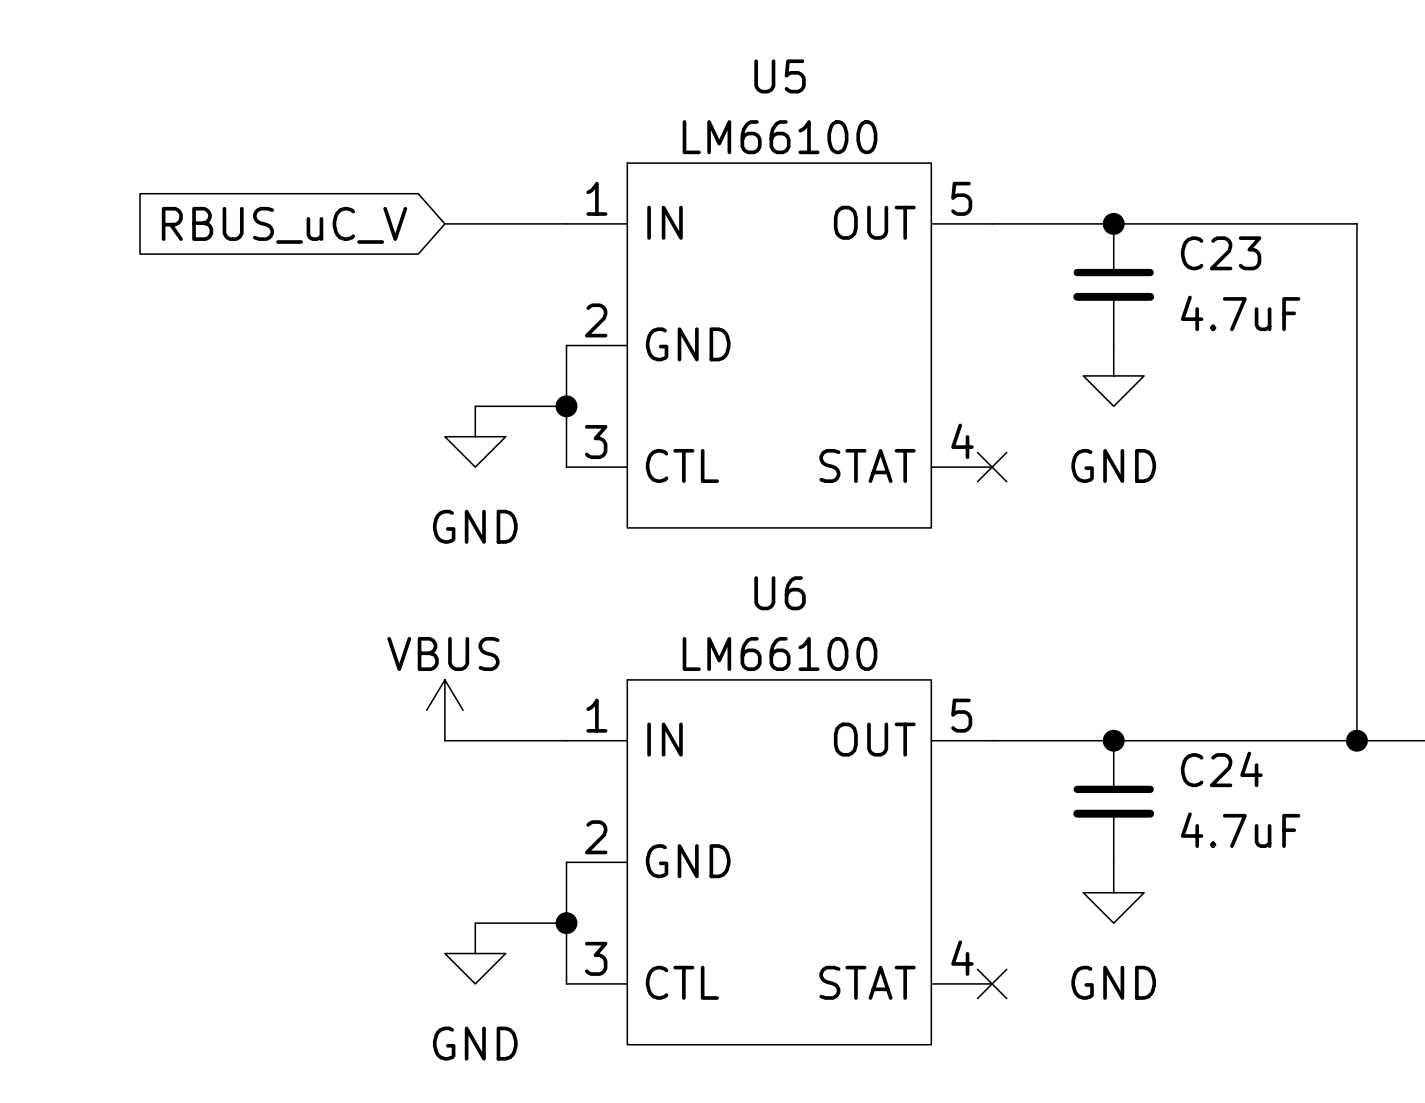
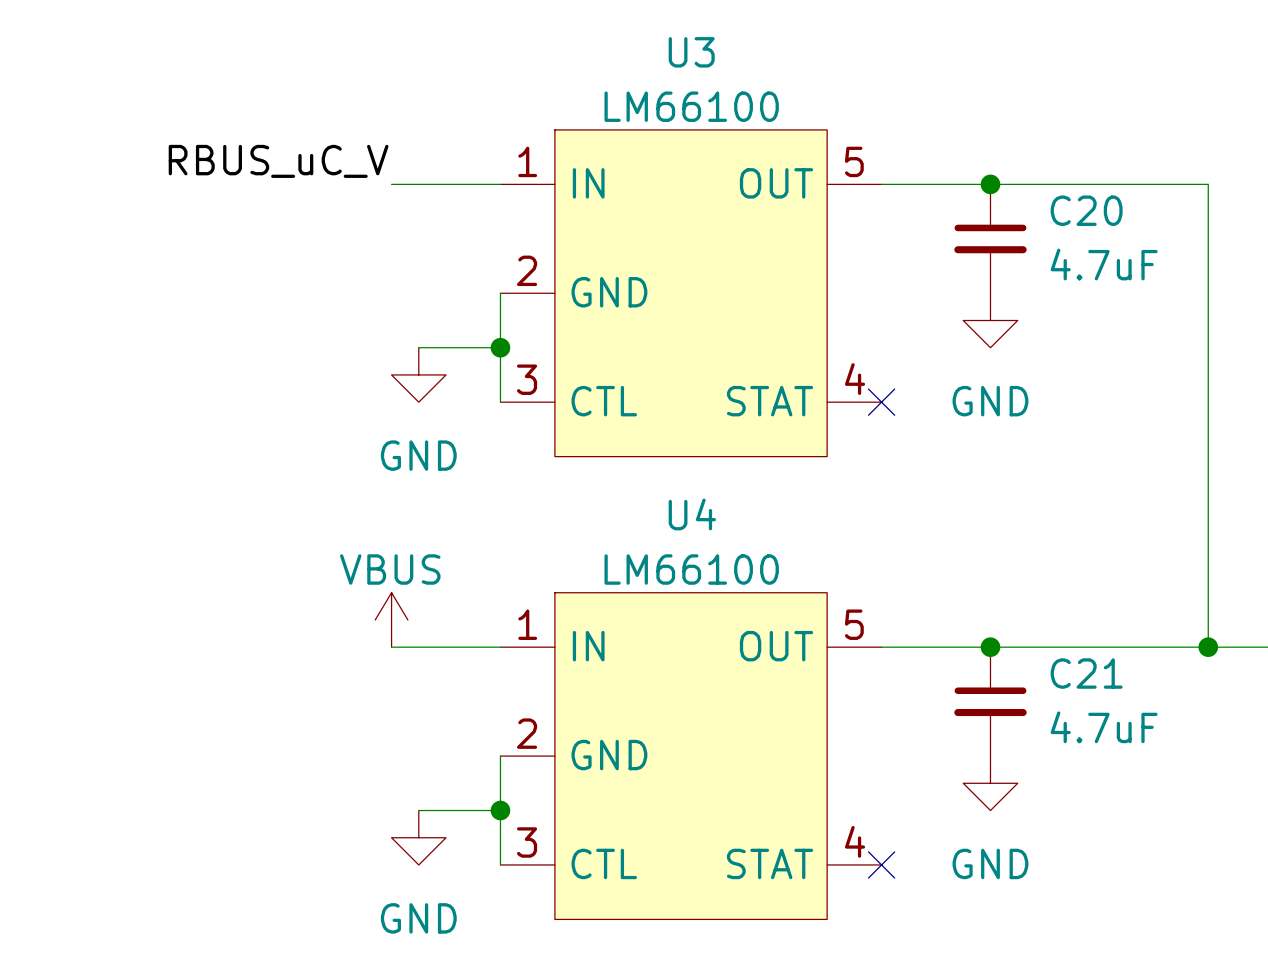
U5 name: U5 (780, 76) -> U3 (691, 52)
label: none -> RBUS_uC_V (278, 161)
global label: RBUS_uC_V (284, 225) -> none
C23 name: C23 (1221, 253) -> C20 (1086, 210)
U6 name: U6 (780, 593) -> U4 (692, 514)
C24 name: C24 (1221, 769) -> C21 (1086, 673)

